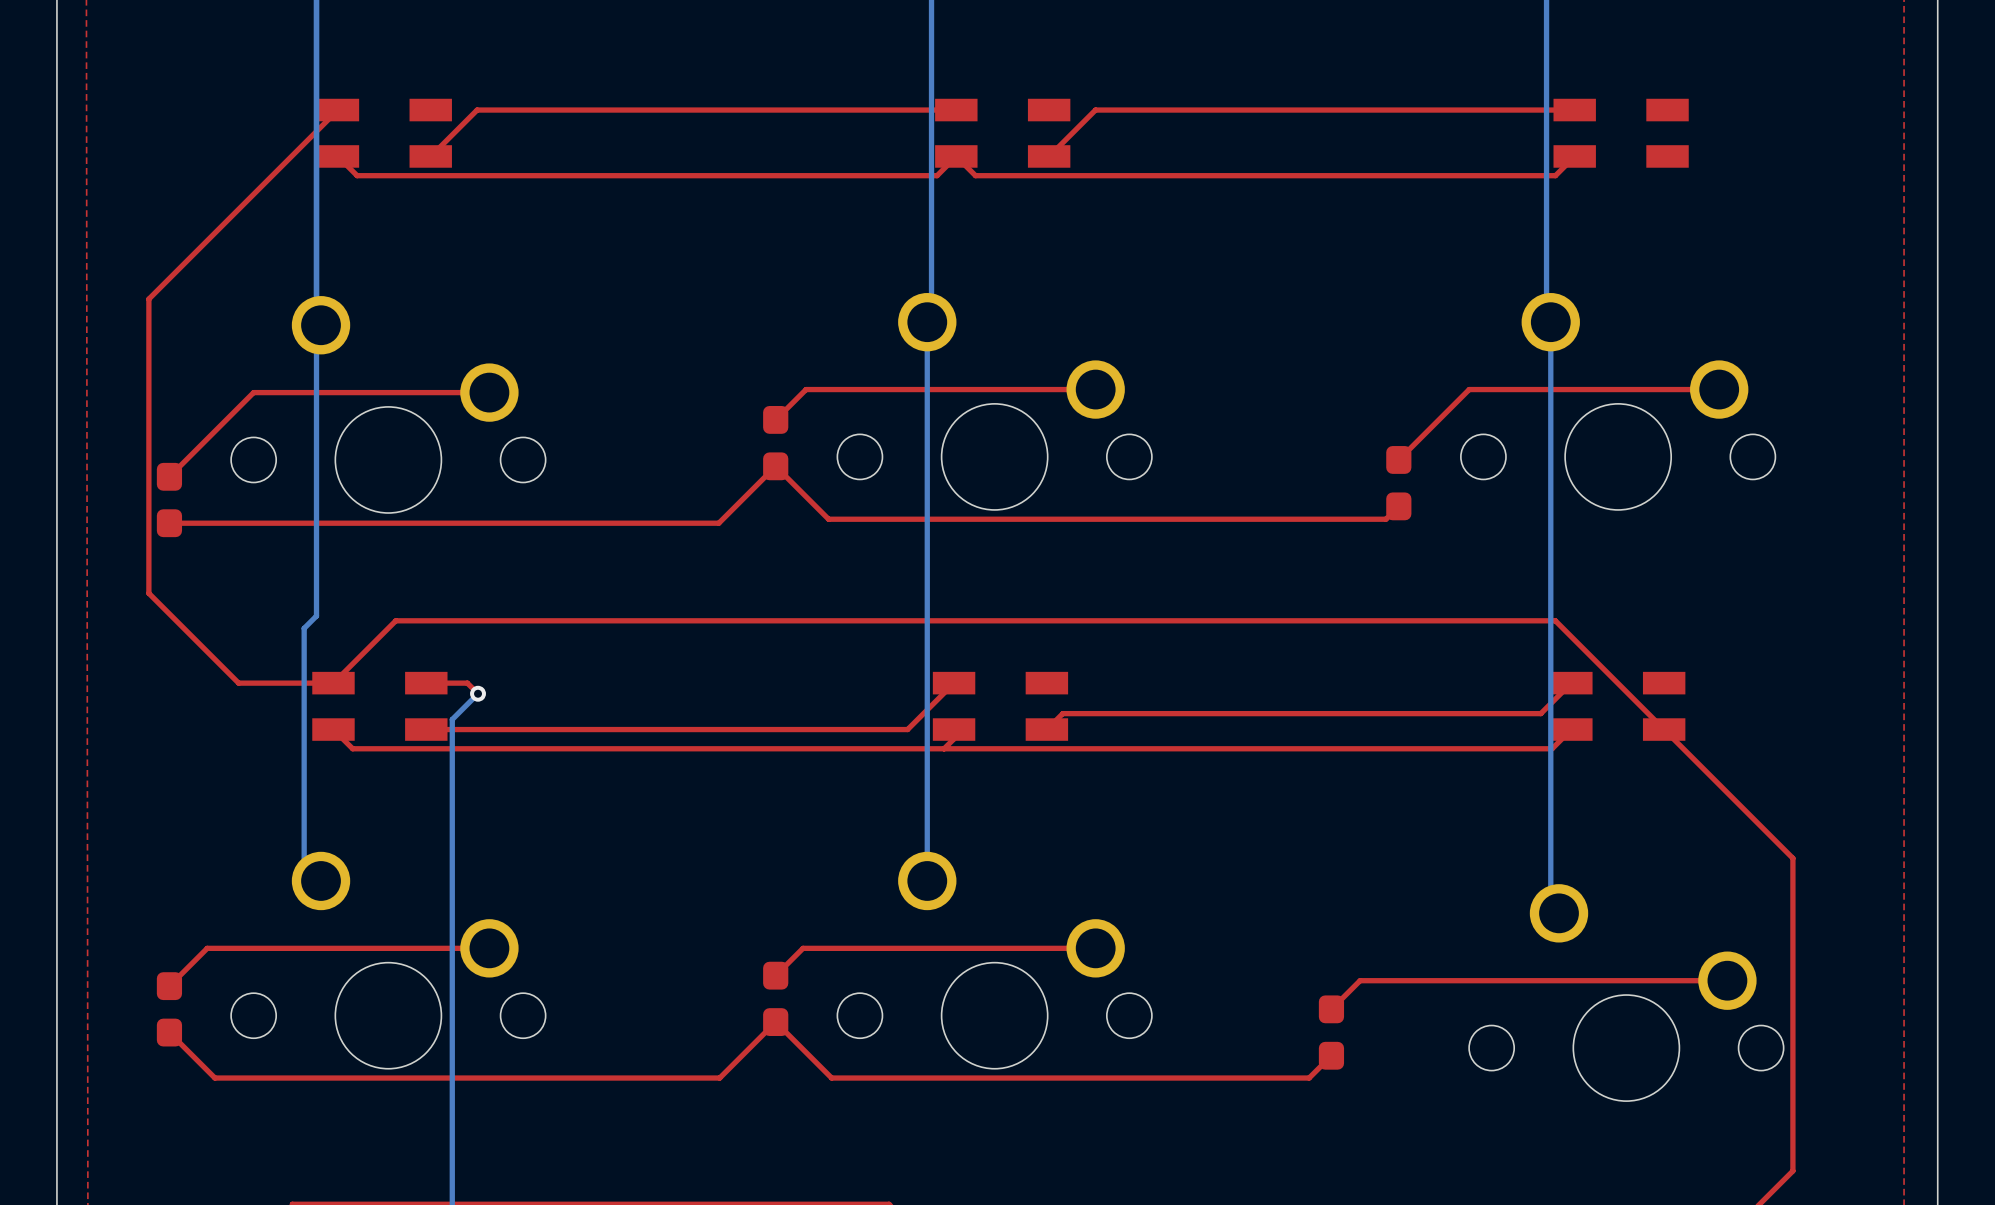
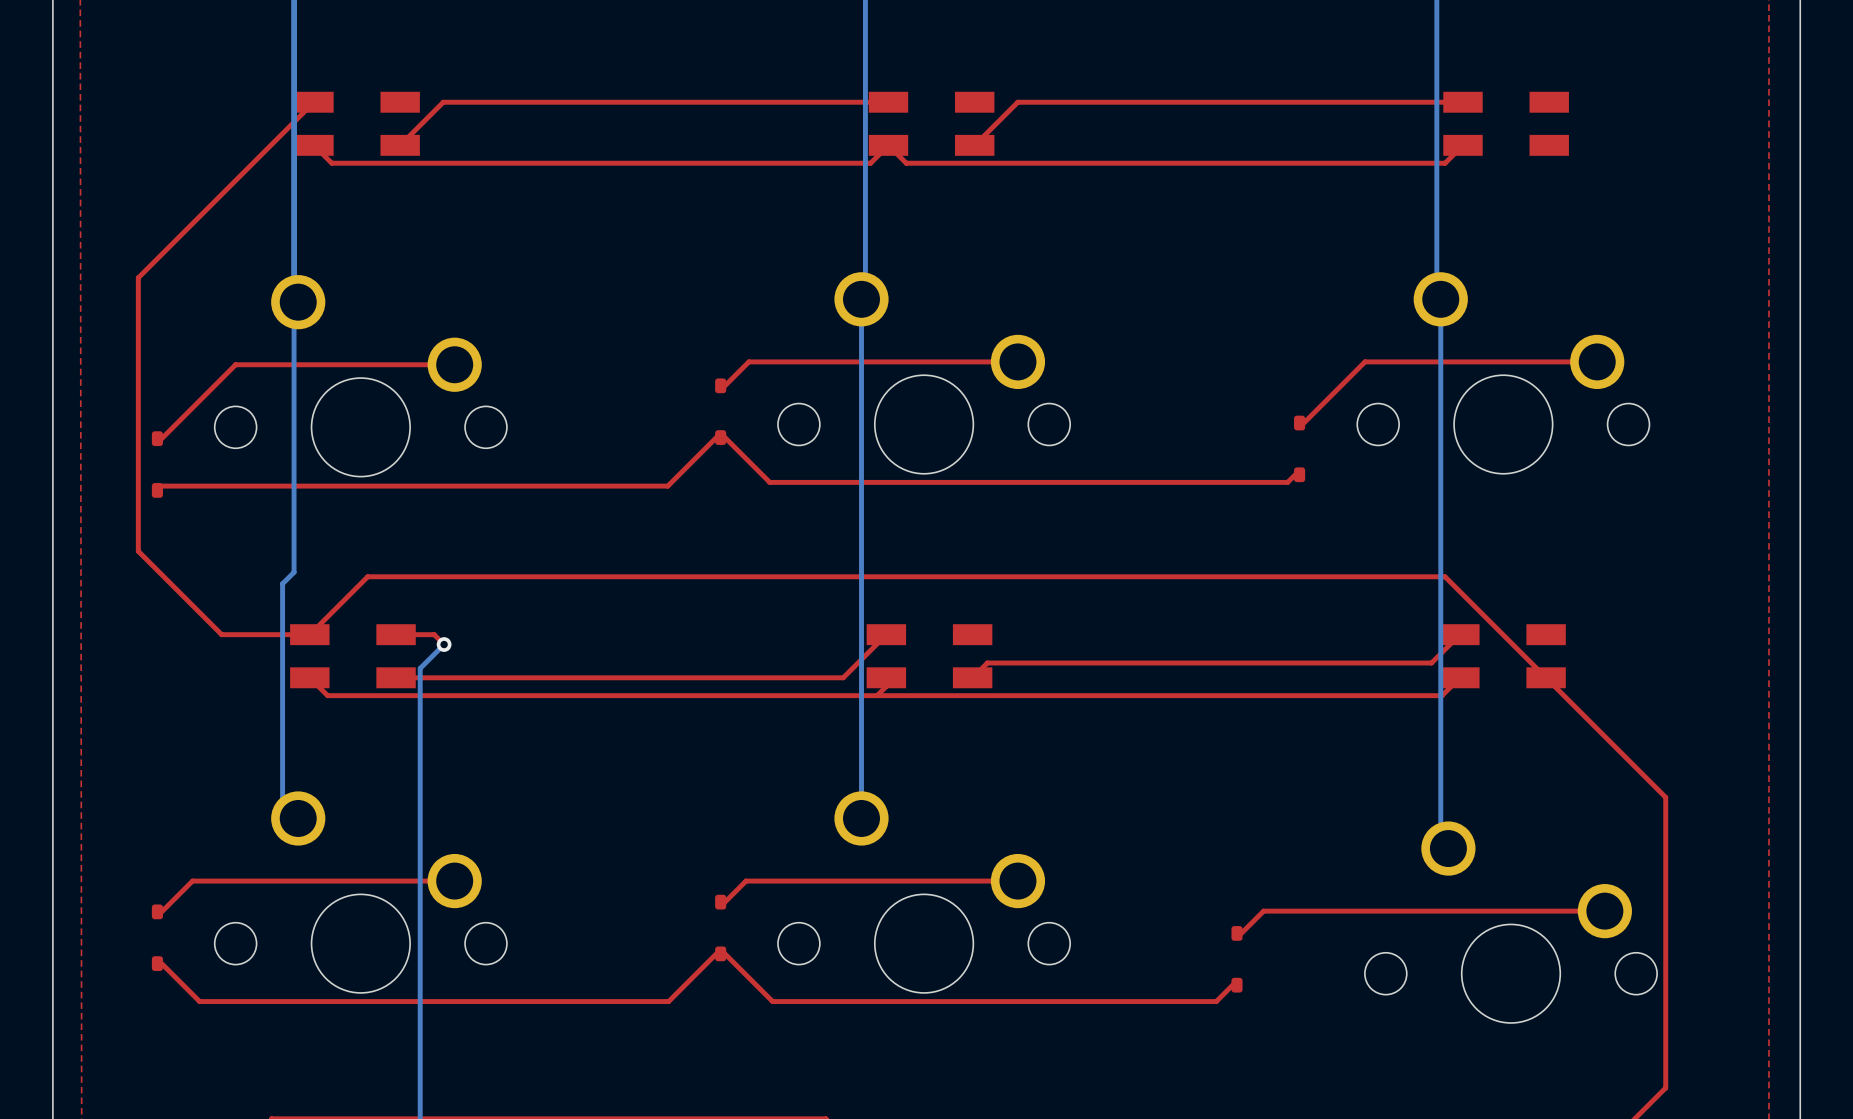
part footprint: [763, 405, 789, 481] -> [715, 378, 727, 445]
part footprint: [1386, 446, 1412, 521] -> [1294, 415, 1306, 483]
part footprint: [156, 462, 183, 538] -> [151, 431, 163, 498]
part footprint: [763, 961, 789, 1036] -> [715, 894, 727, 962]
part footprint: [156, 972, 183, 1047] -> [151, 904, 163, 972]
part footprint: [1318, 995, 1345, 1070] -> [1231, 926, 1243, 993]

